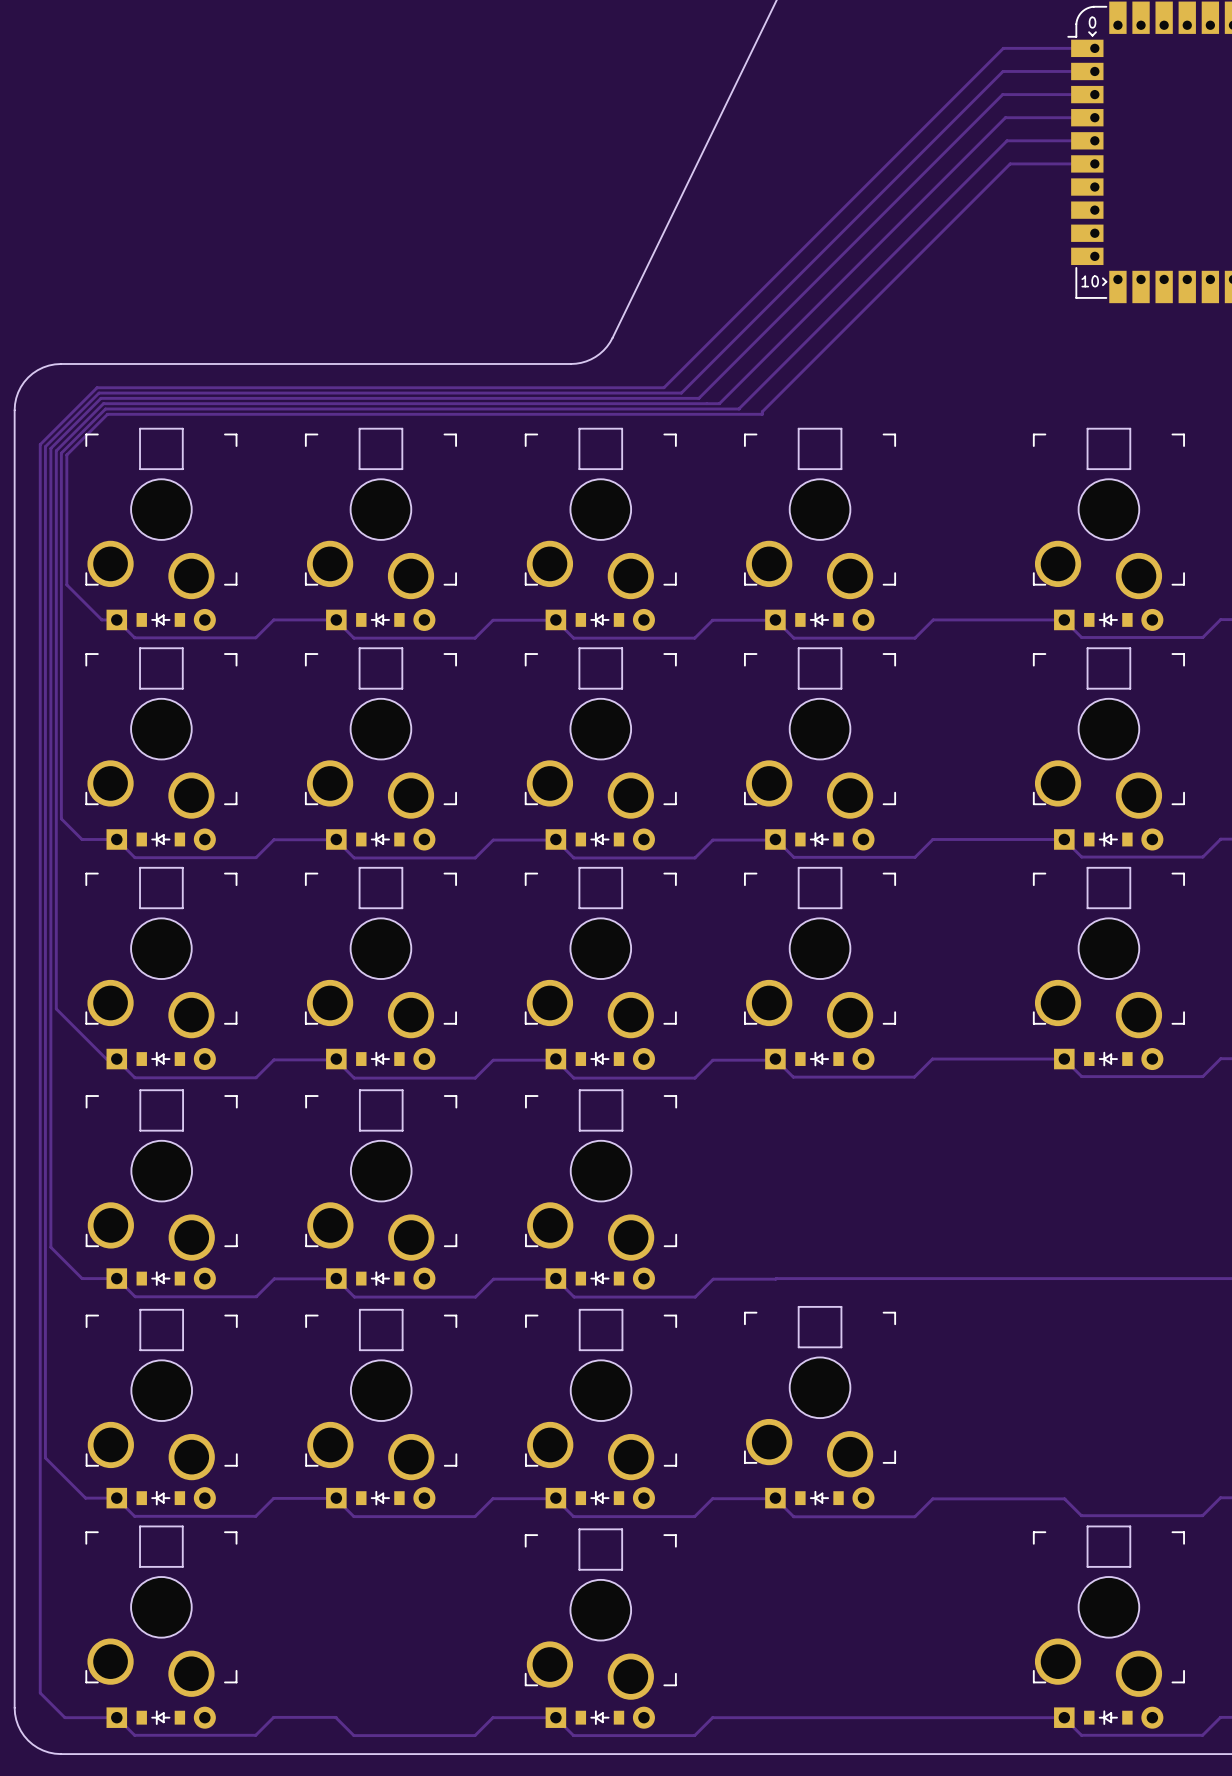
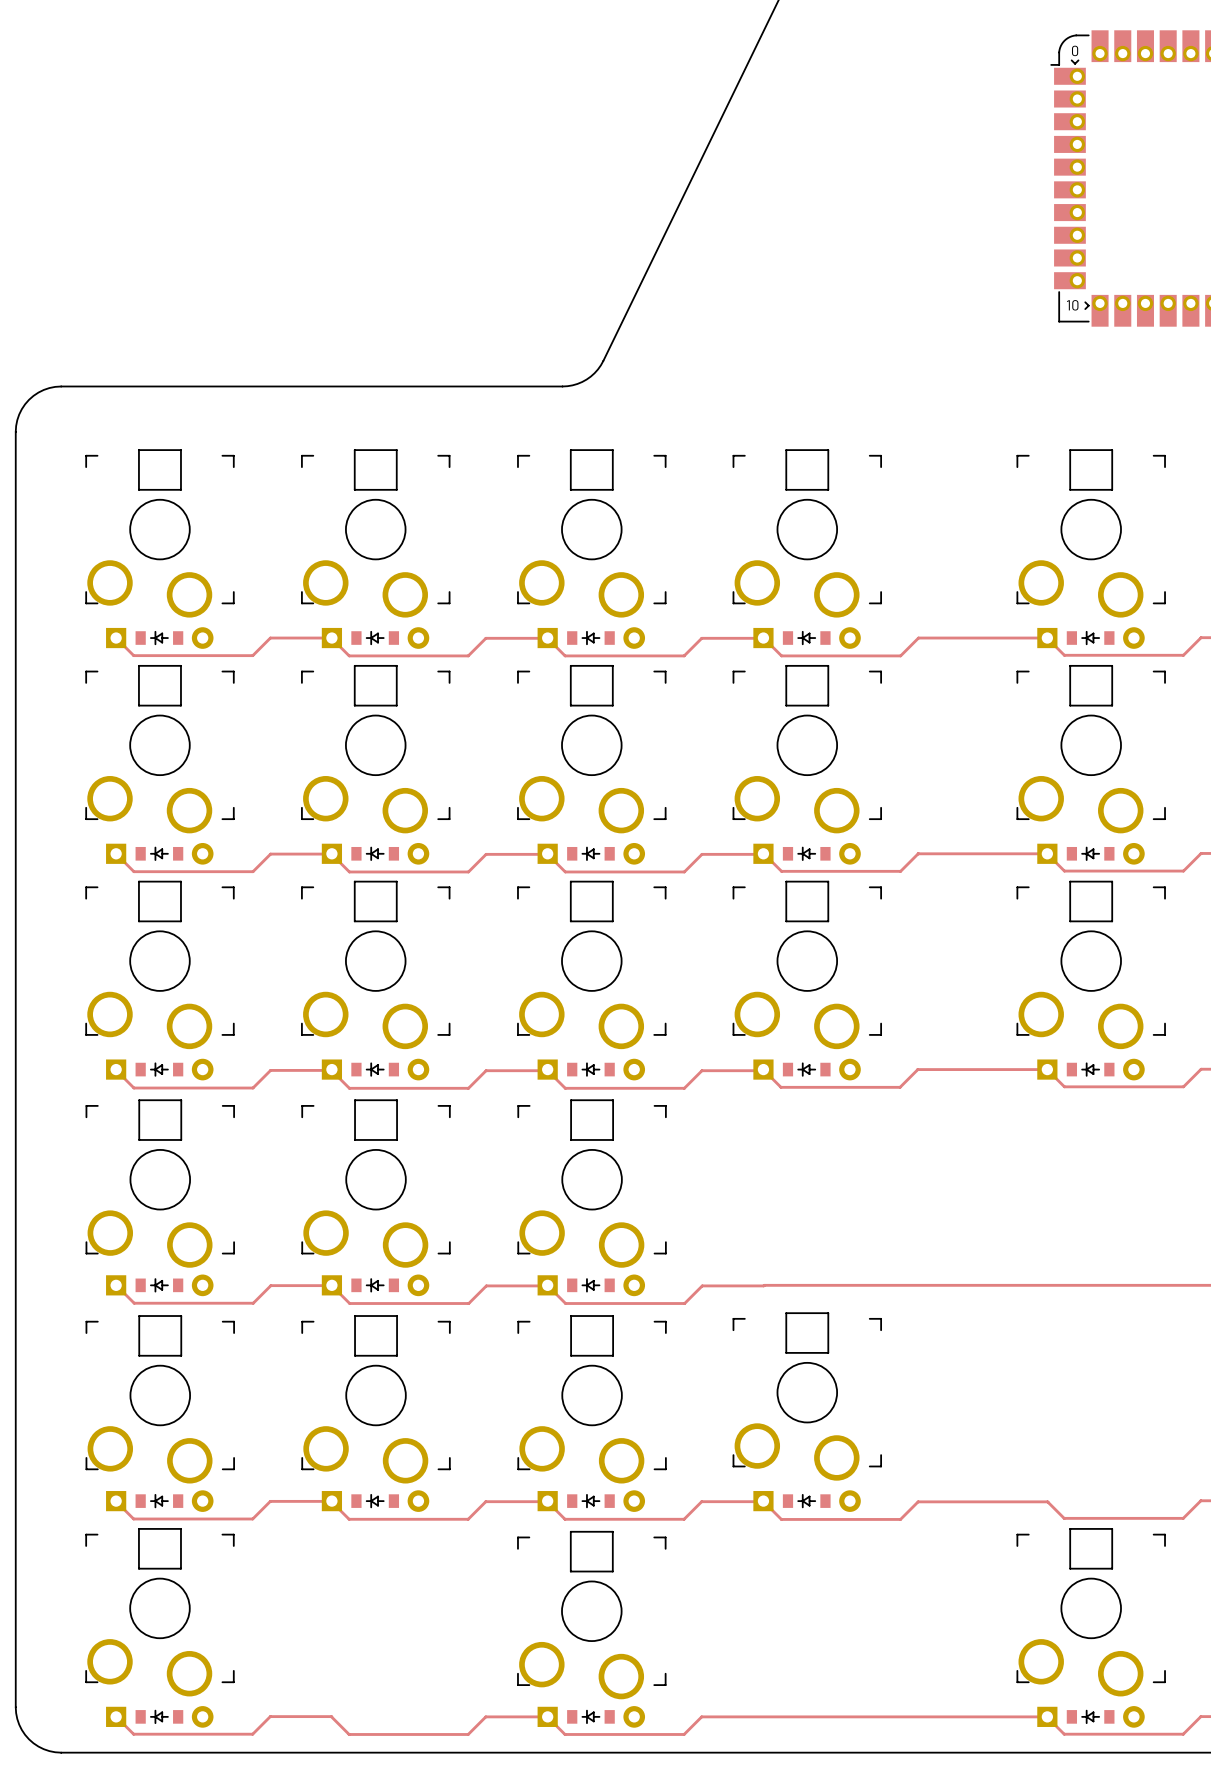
track: (1087, 48) (1003, 48) (663, 387) (97, 387) (40, 444) (40, 1693) (64, 1717) (116, 1717) -> none
track: (1087, 71) (1003, 71) (681, 393) (99, 393) (45, 446) (45, 1457) (85, 1498) (116, 1498) -> none
track: (1087, 94) (1002, 94) (698, 398) (100, 398) (50, 448) (50, 1247) (82, 1278) (116, 1278) -> none
track: (1087, 117) (1005, 117) (719, 403) (103, 403) (56, 450) (56, 1008) (106, 1059) (116, 1059) -> none
track: (1087, 140) (1007, 140) (739, 408) -> none
track: (1087, 163) (1010, 163) (762, 411) (762, 414) (107, 414) (66, 454) (66, 584) (101, 619) (116, 619) -> none
track: (739, 409) (105, 409) (61, 453) (61, 818) (82, 839) (116, 839) -> none

